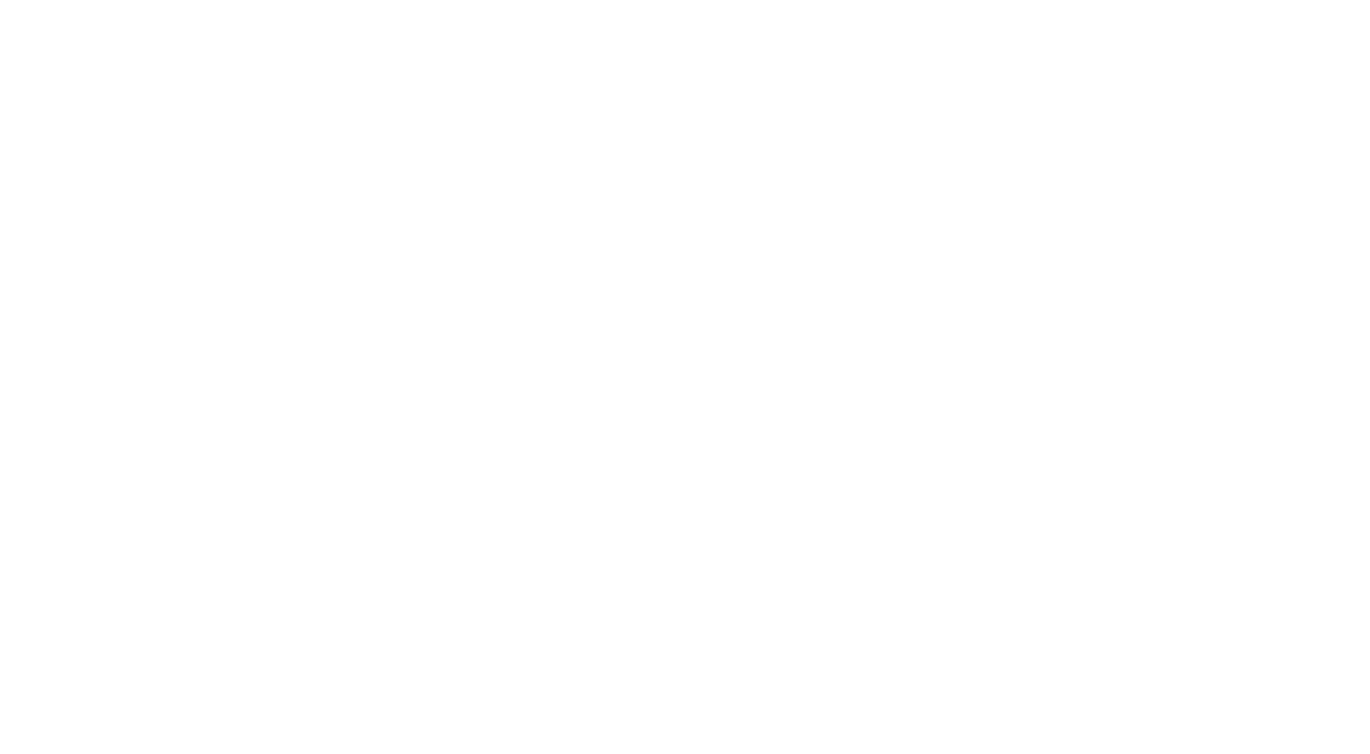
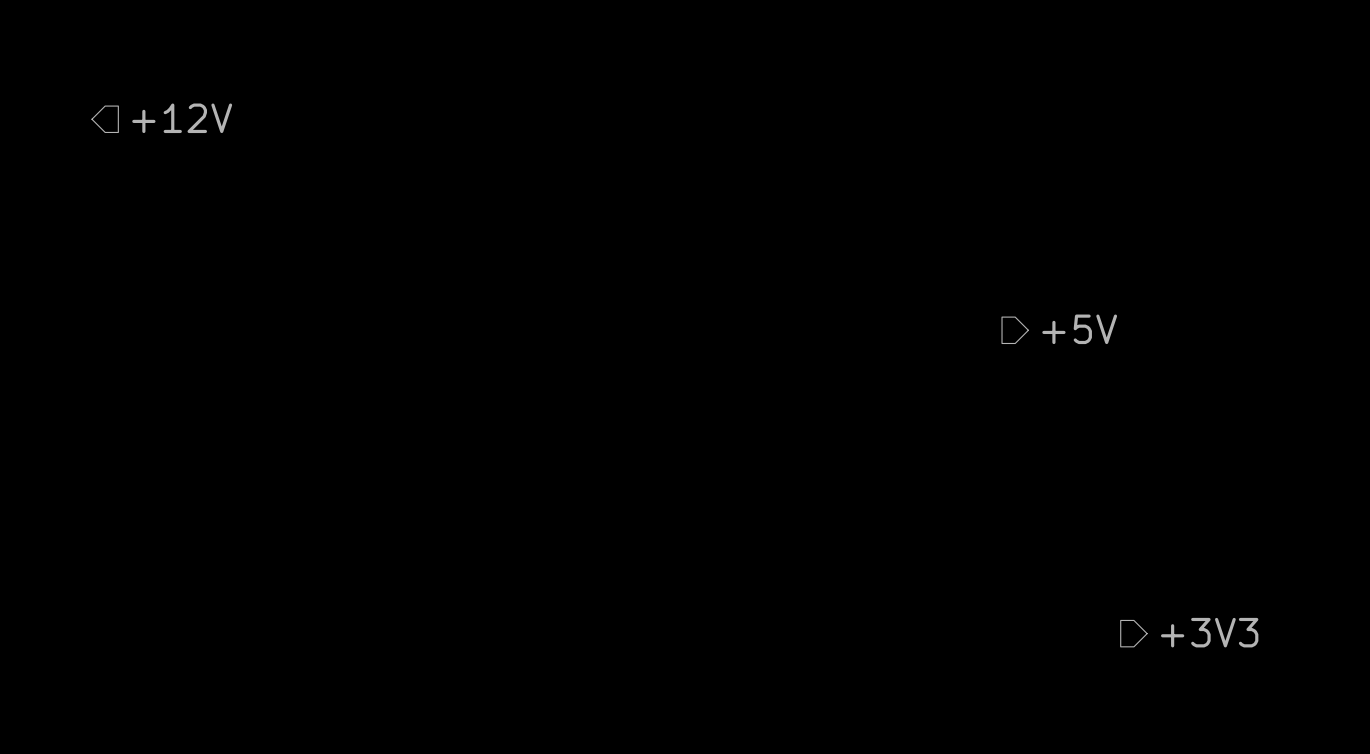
hierarchical label: none -> +12V (182, 118)
hierarchical label: none -> +5V (1079, 329)
hierarchical label: none -> +3V3 (1209, 632)

